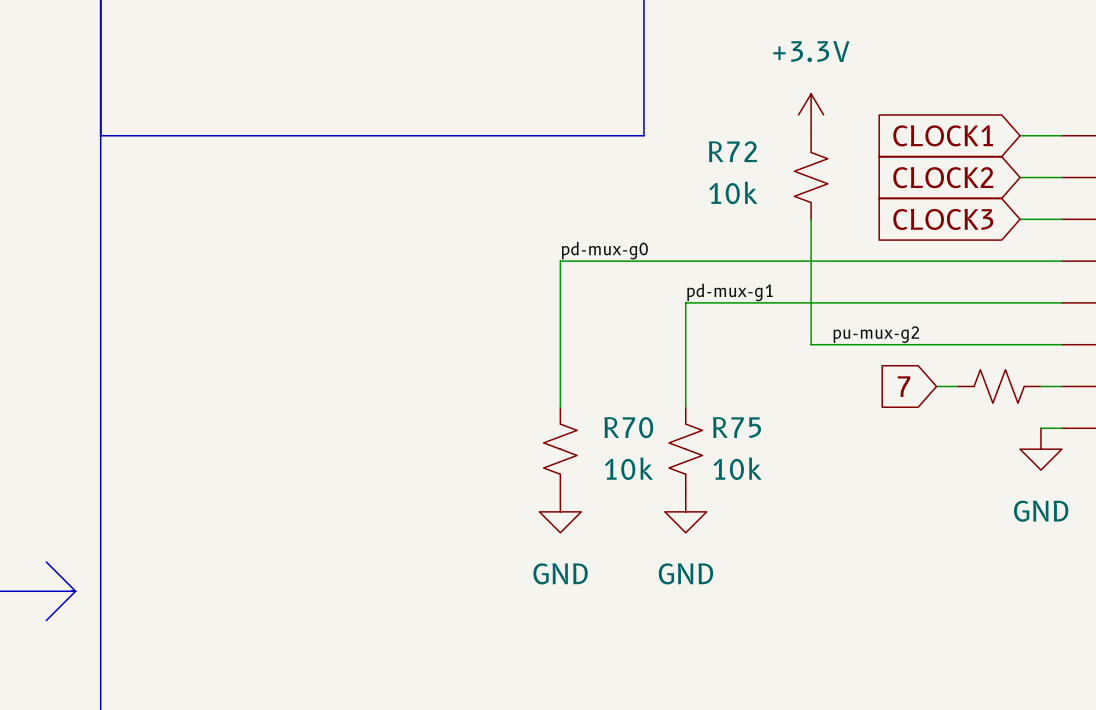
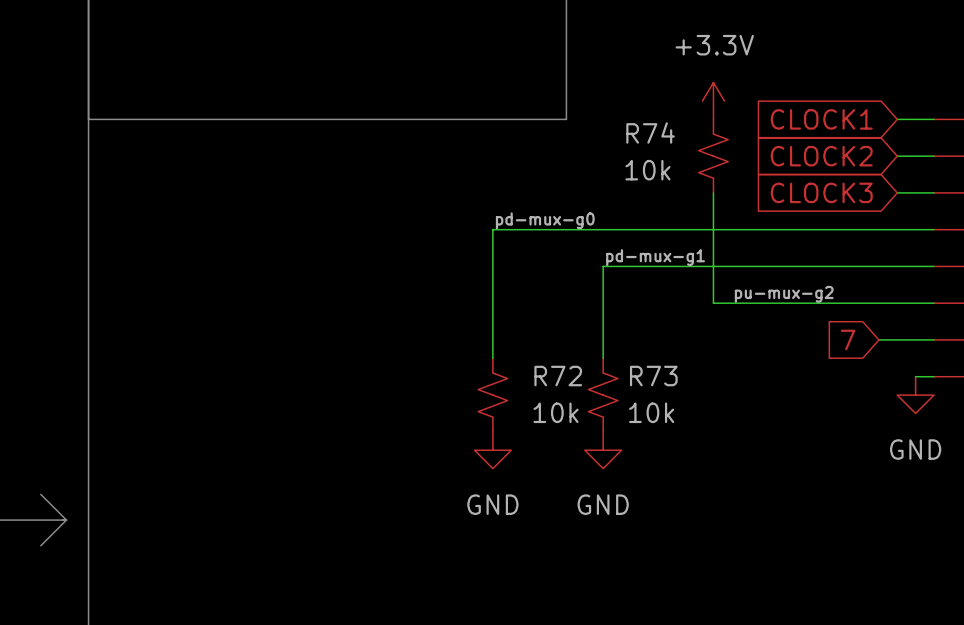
R72 name: R72 (732, 151) -> R74 (650, 132)
global label position: 7 (904, 386) -> 7 (847, 339)
wire: (936, 386) (957, 386) -> none
wire: none -> (878, 339) (915, 339)
part: (999, 386) -> none
R70 name: R70 (628, 427) -> R72 (558, 376)
R75 name: R75 (736, 427) -> R73 (653, 376)

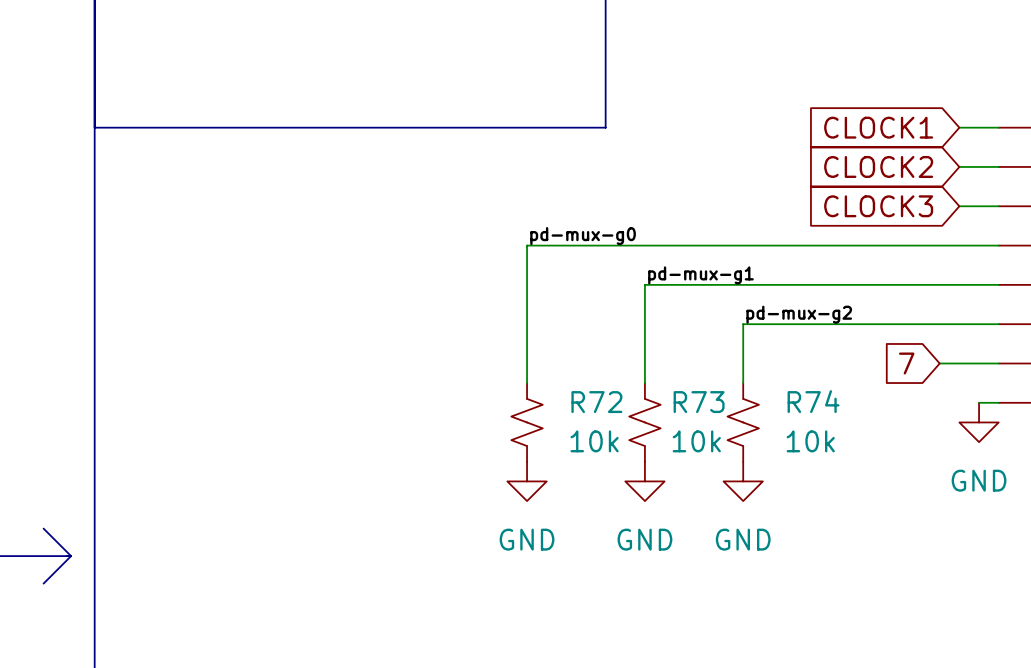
power symbol: +3.3V (713, 101) -> none
R74 name position: R74 (650, 132) -> R74 (813, 401)
R74 position: (713, 156) -> (743, 422)
R74 value position: 10k (647, 170) -> 10k (810, 441)
wire: (713, 192) (713, 303) -> (743, 383) (743, 324) (762, 324)
label: pu-mux-g2 (784, 294) -> pd-mux-g2 (799, 314)
power symbol: none -> GND (743, 481)

